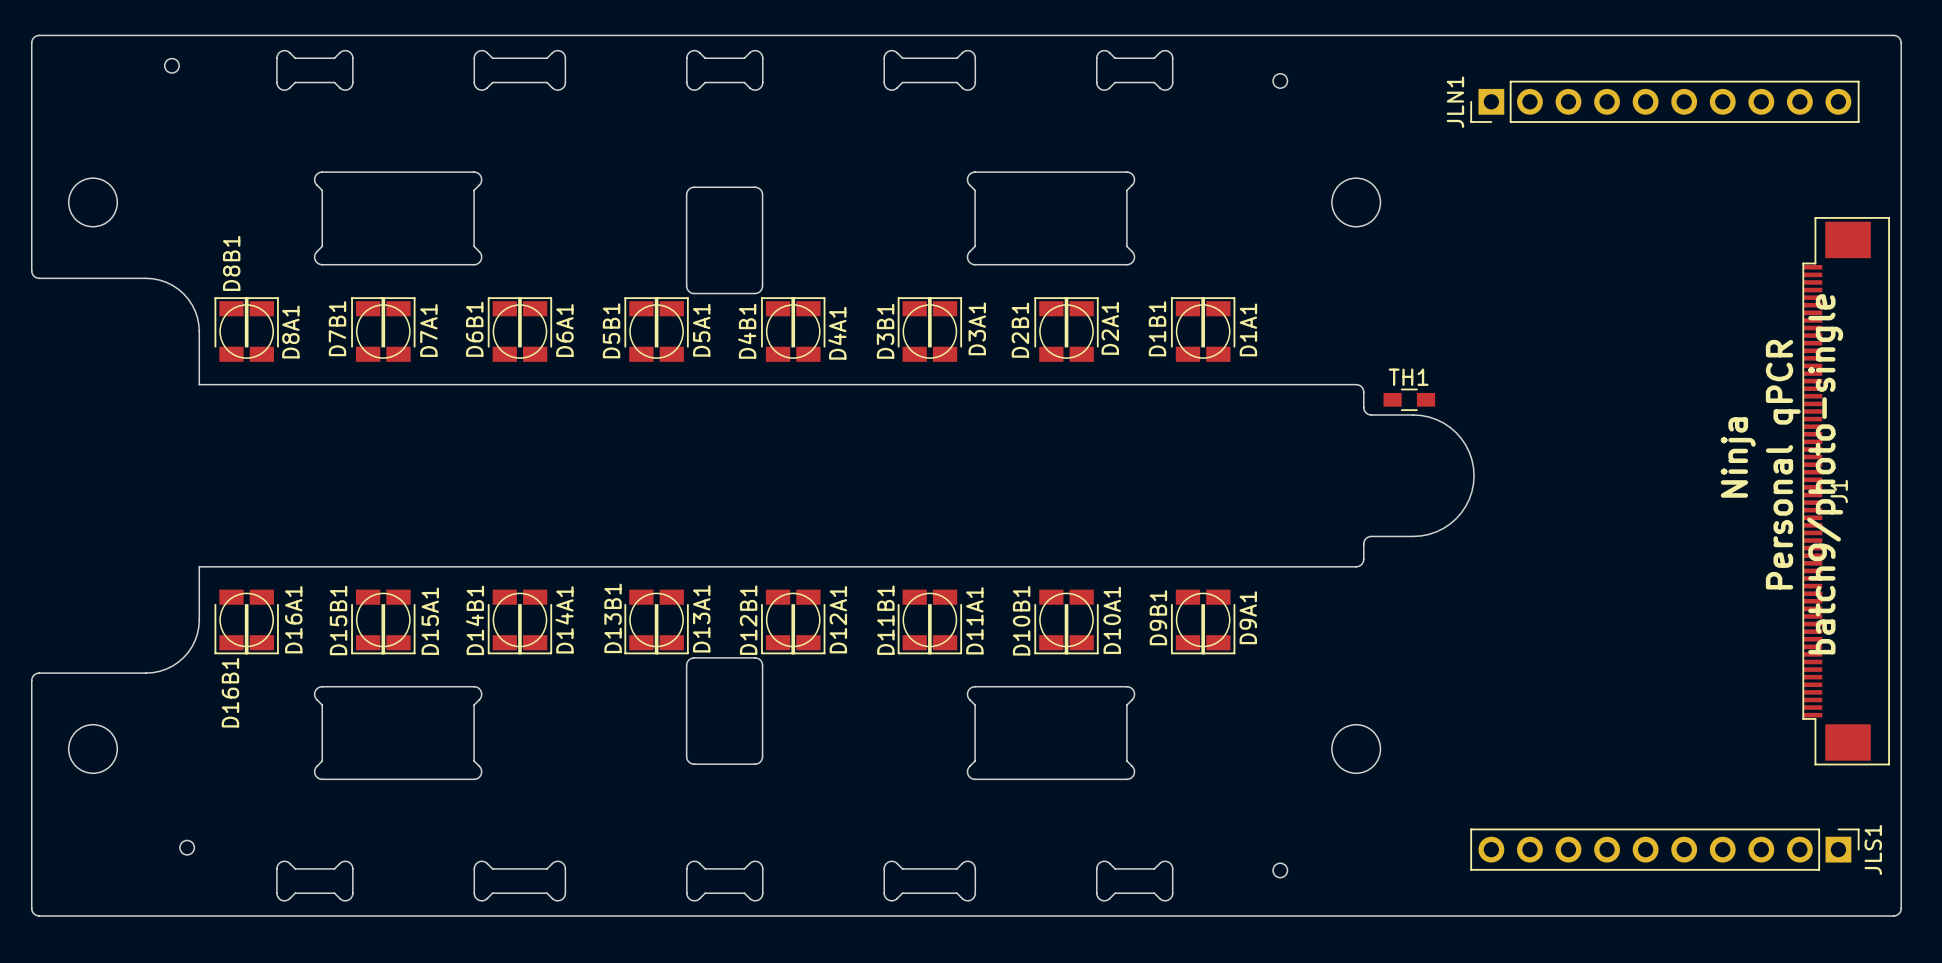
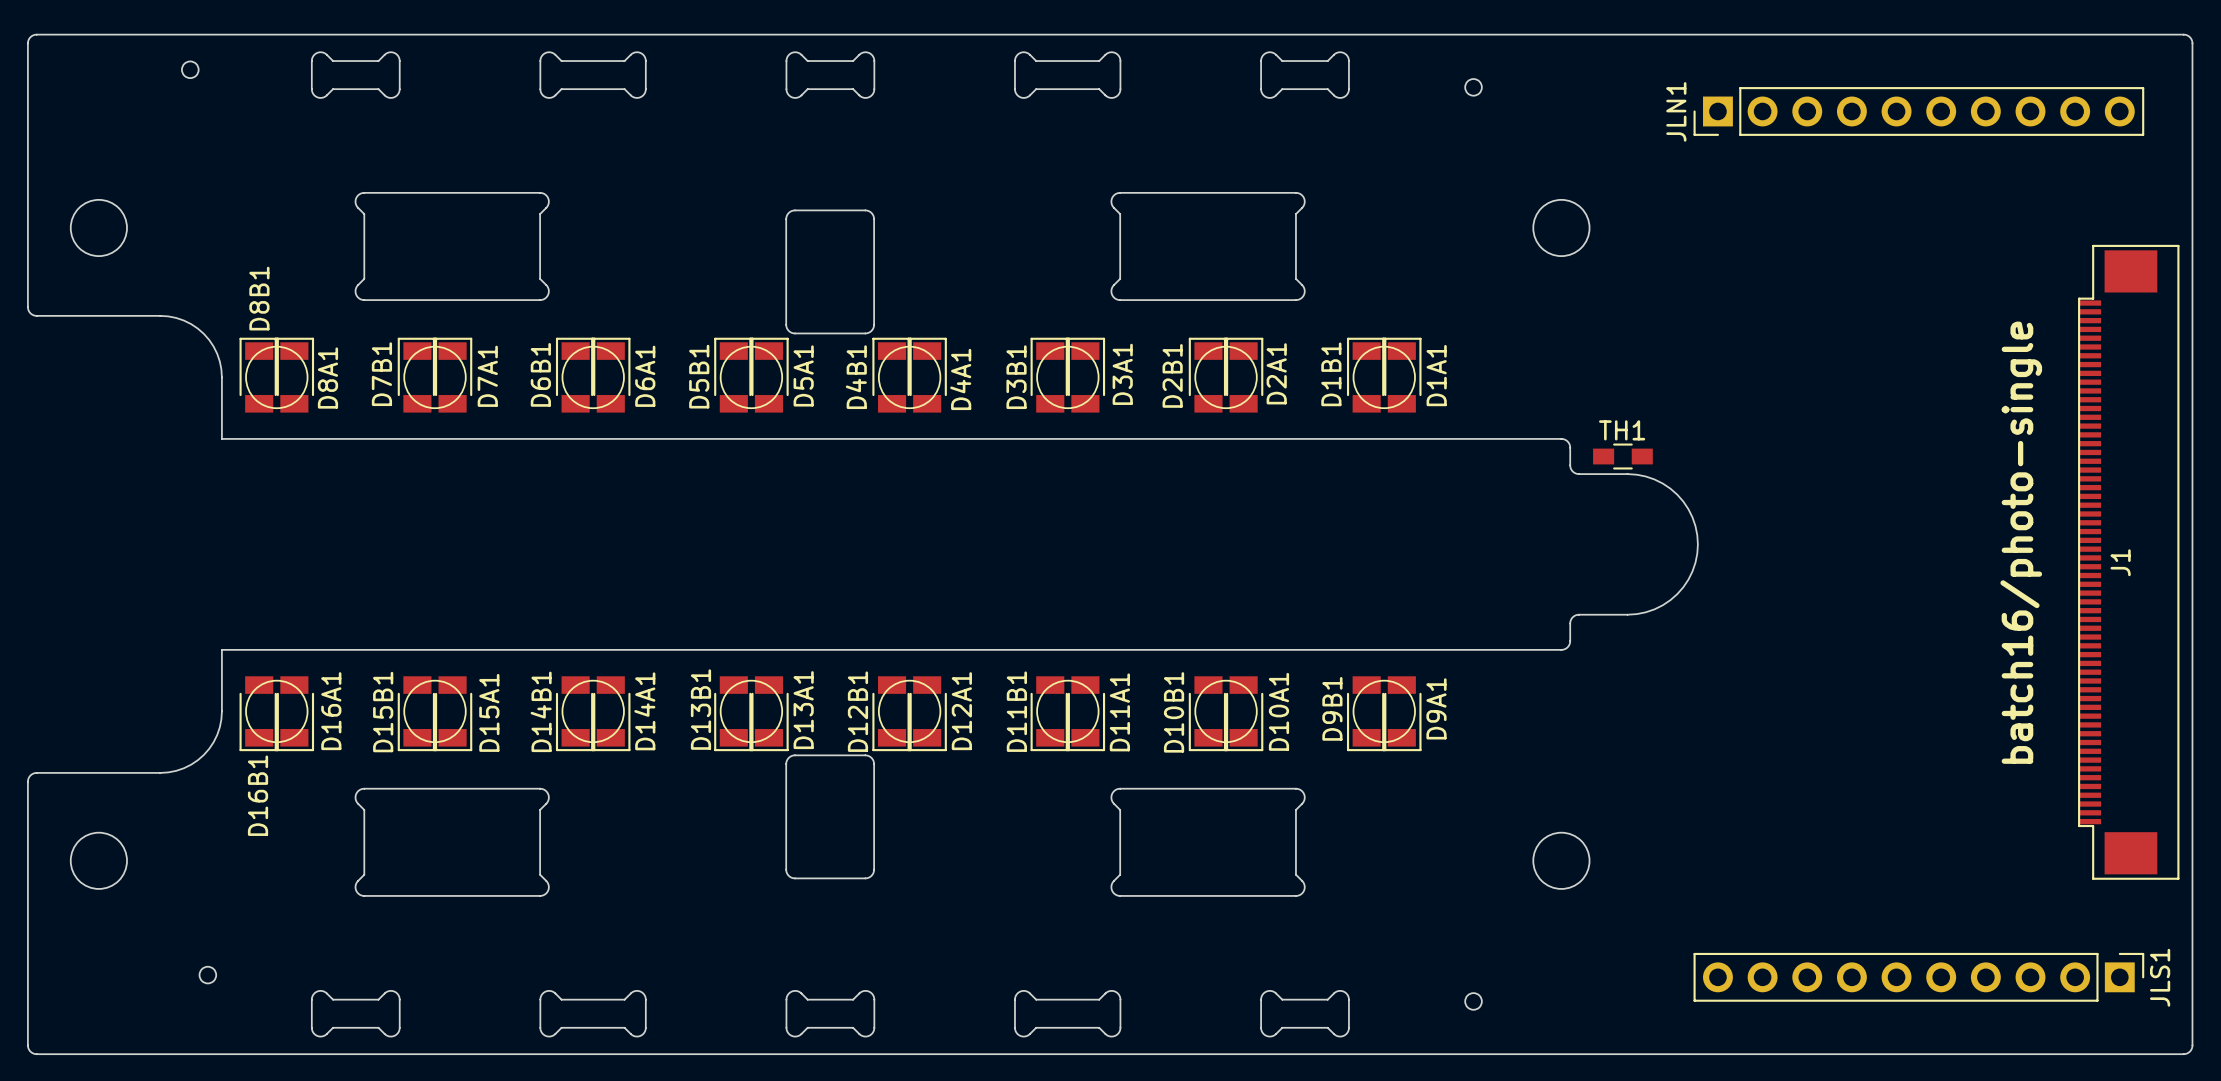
text: Ninja (1738, 457) -> none
text: Personal qPCR (1783, 464) -> none
text: none -> batch16/photo-single (2021, 542)
text: batch9/photo-single (1825, 474) -> none

